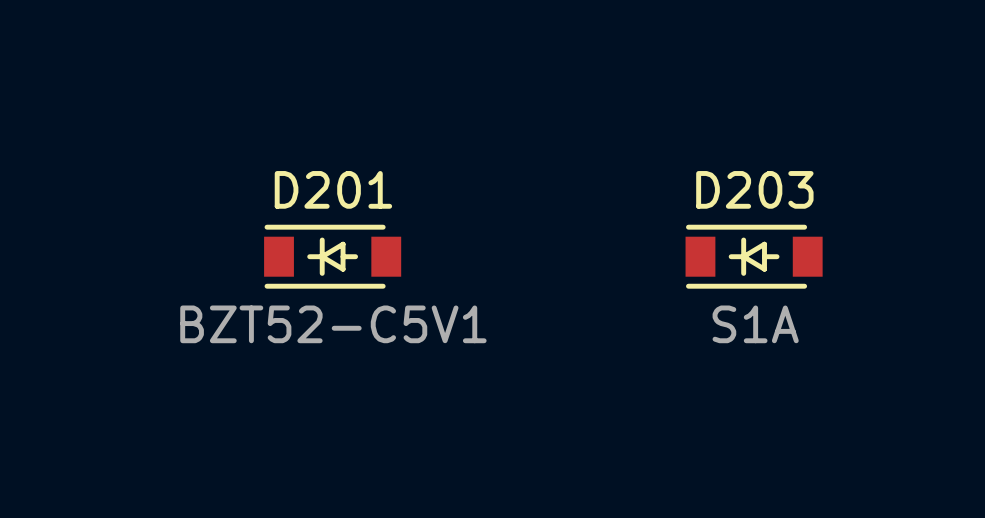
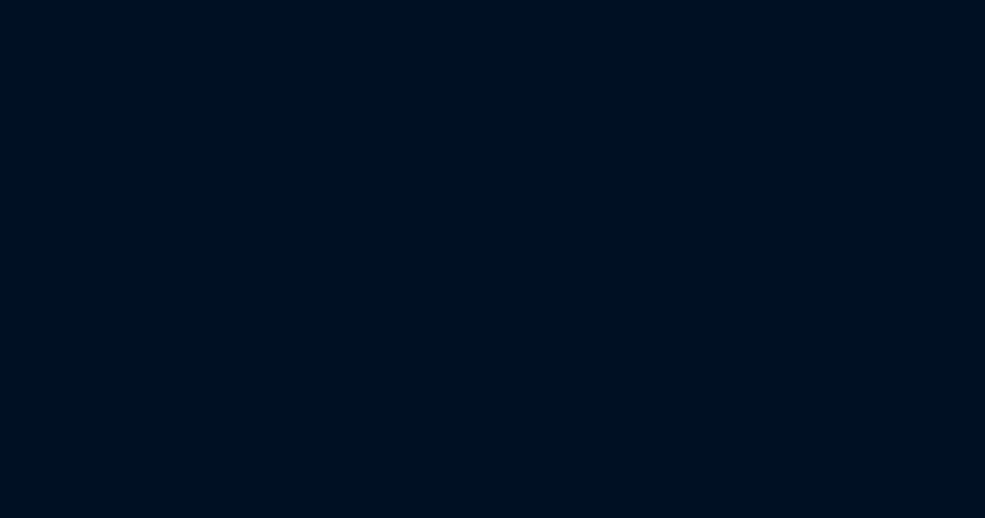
D201: BZT52-C5V1 (332, 256) -> none
D203: S1A (754, 256) -> none

